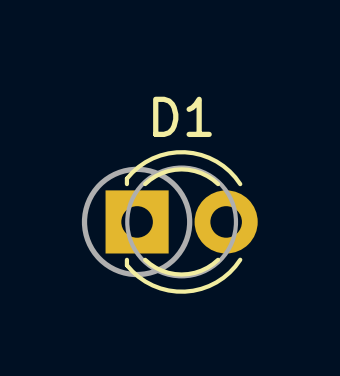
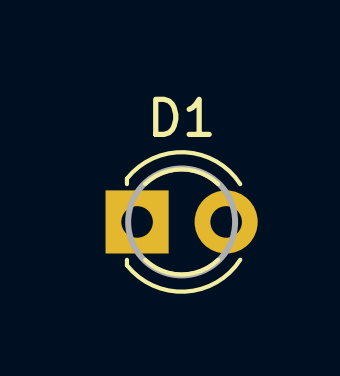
D1 footprint: [81, 150, 258, 294] -> [105, 150, 258, 294]

